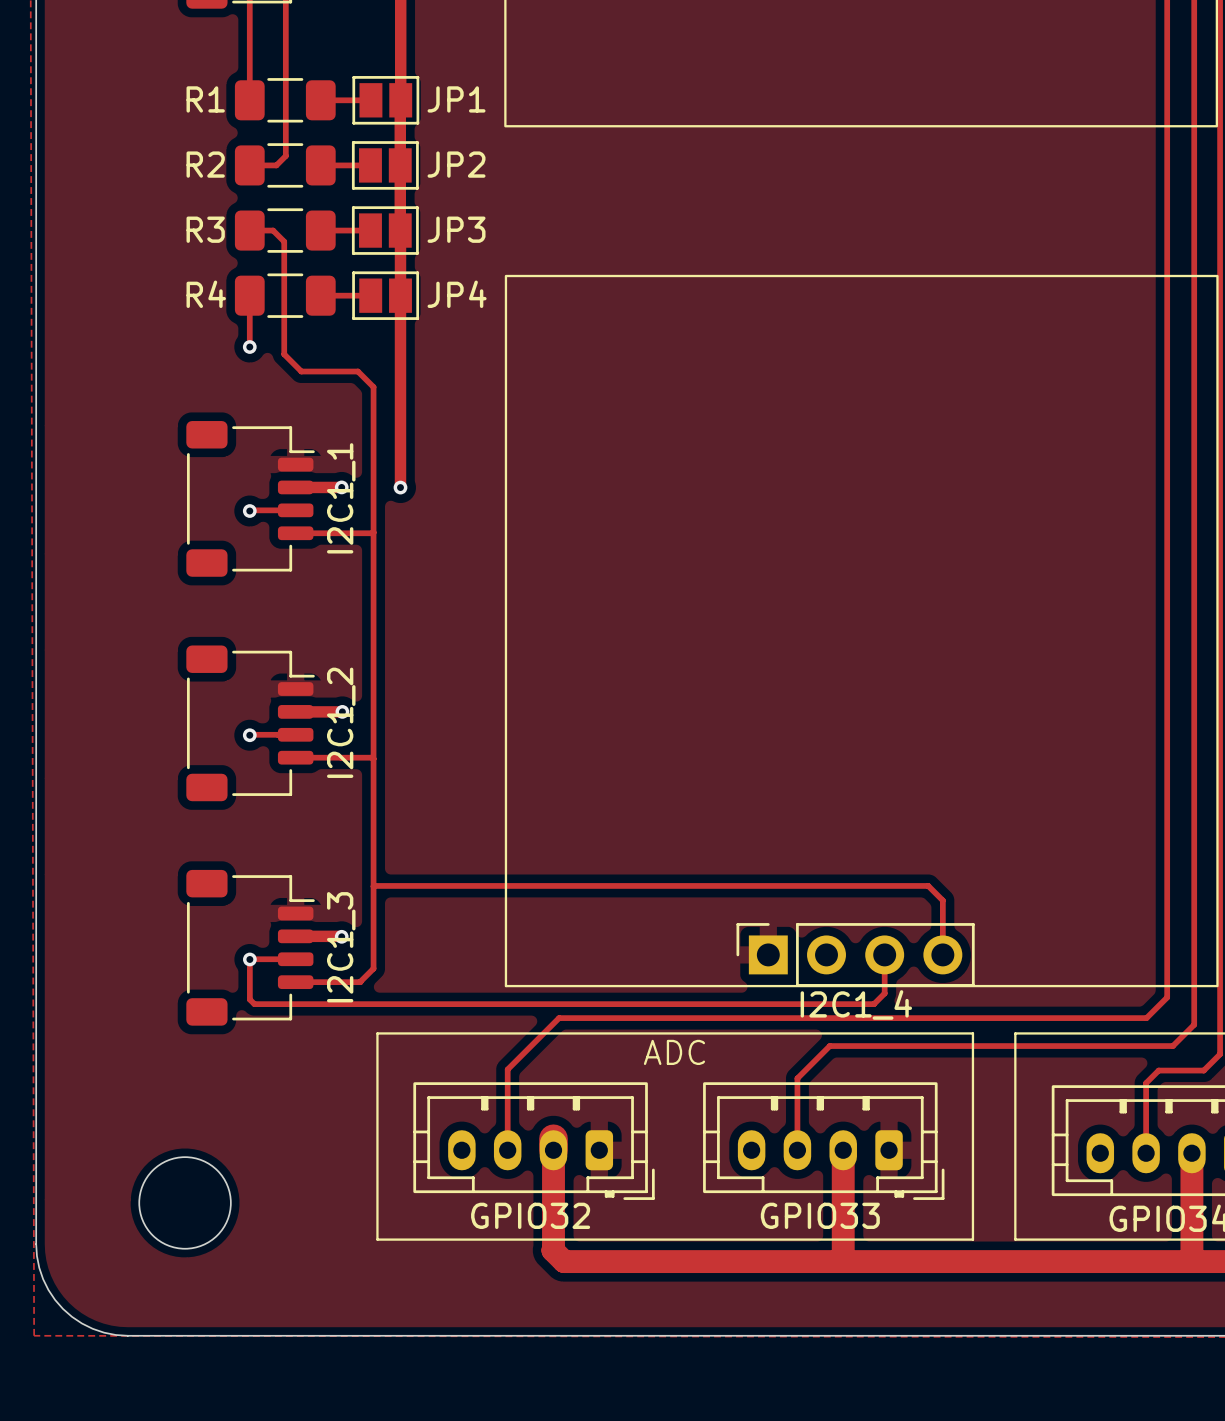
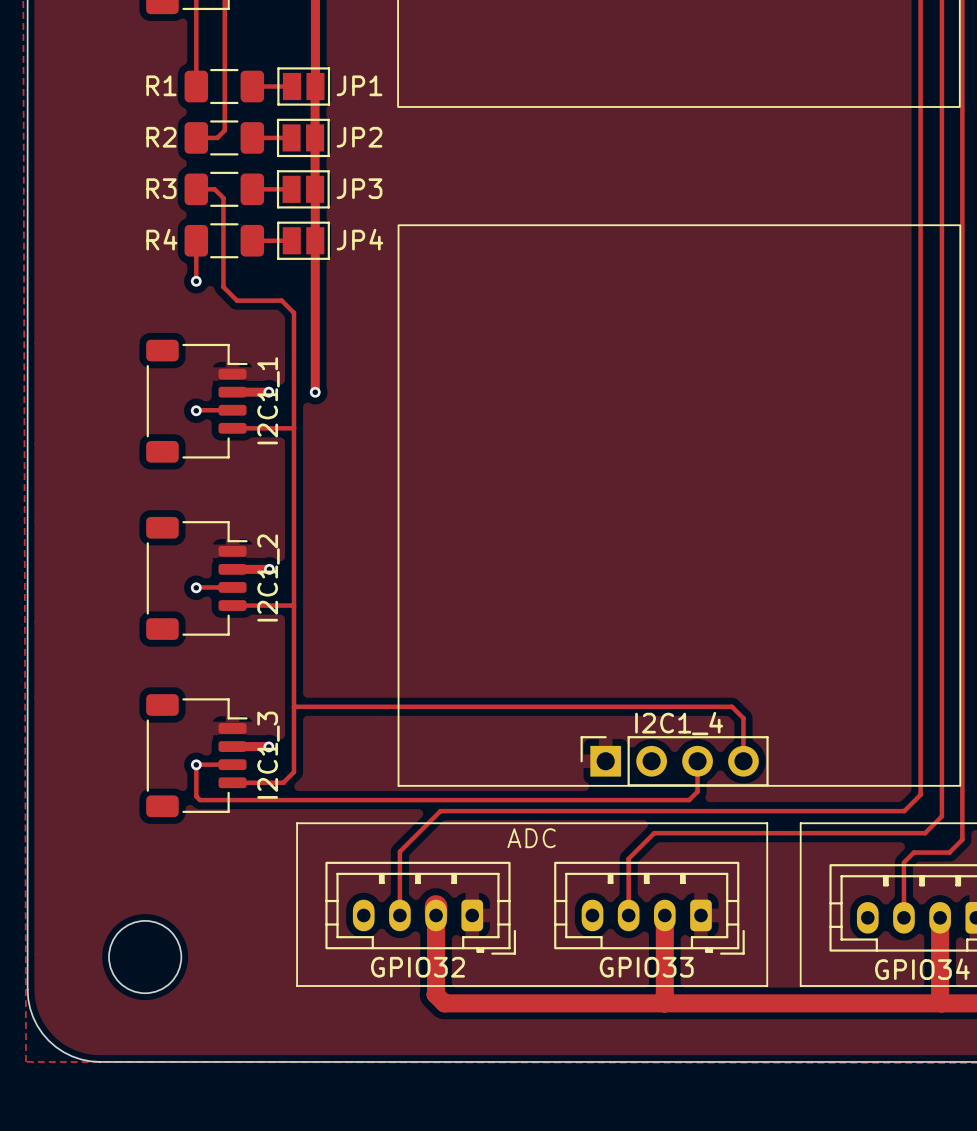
I2C1_4 name position: I2C1_4 (856, 1004) -> I2C1_4 (679, 723)

